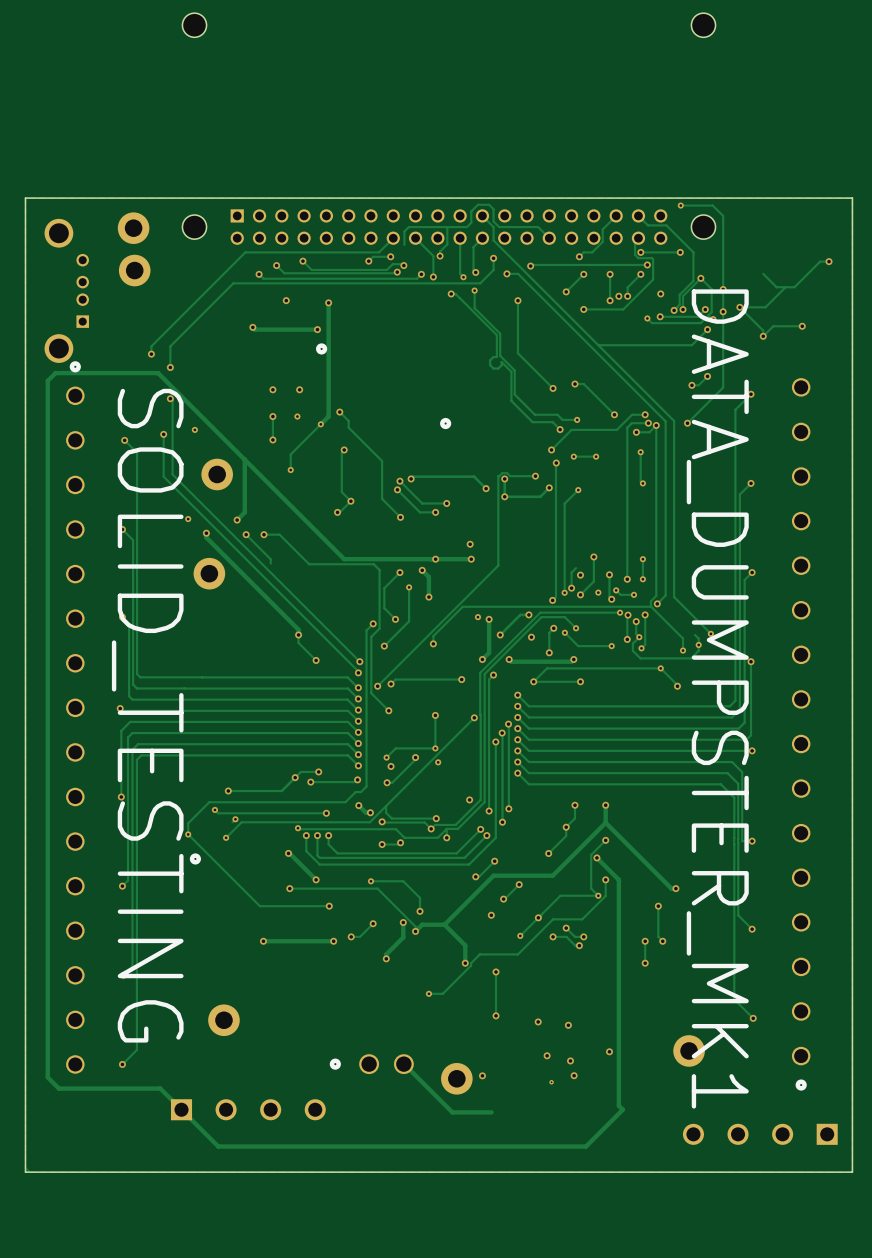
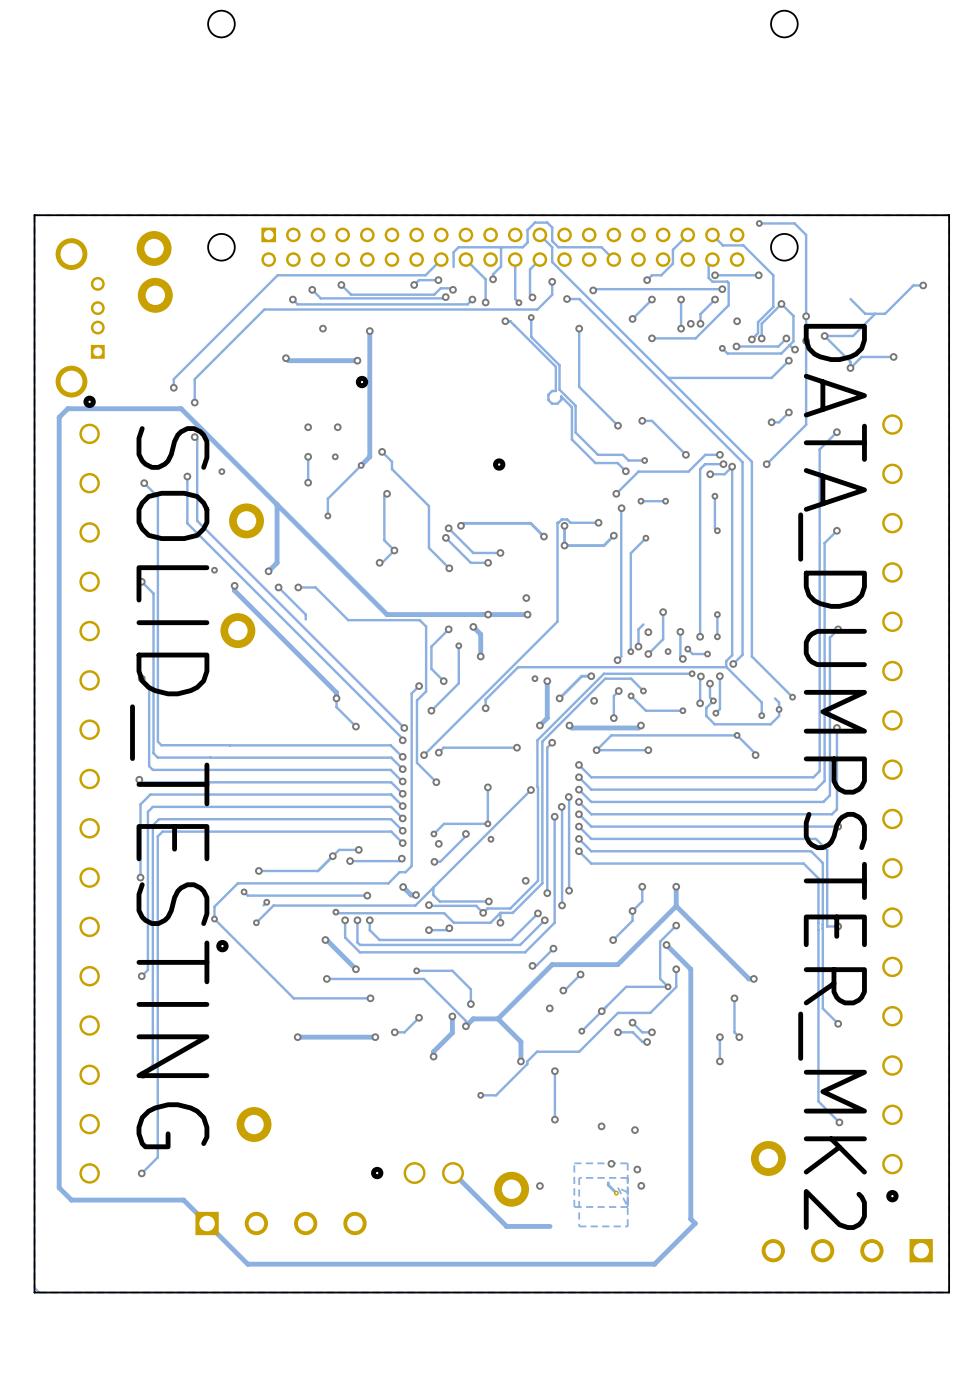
text: DATA_DUMPSTER_MK1 (717, 698) -> DATA_DUMPSTER_MK2 (832, 776)
via: (609, 1051) -> none
zone outline: none -> (627, 1177) (579, 1177) (579, 1226) (627, 1226) (627, 1163) (574, 1163) (574, 1207) (627, 1207) (618, 1187) (627, 1192)
track: none -> (608, 1182) (616, 1193)

